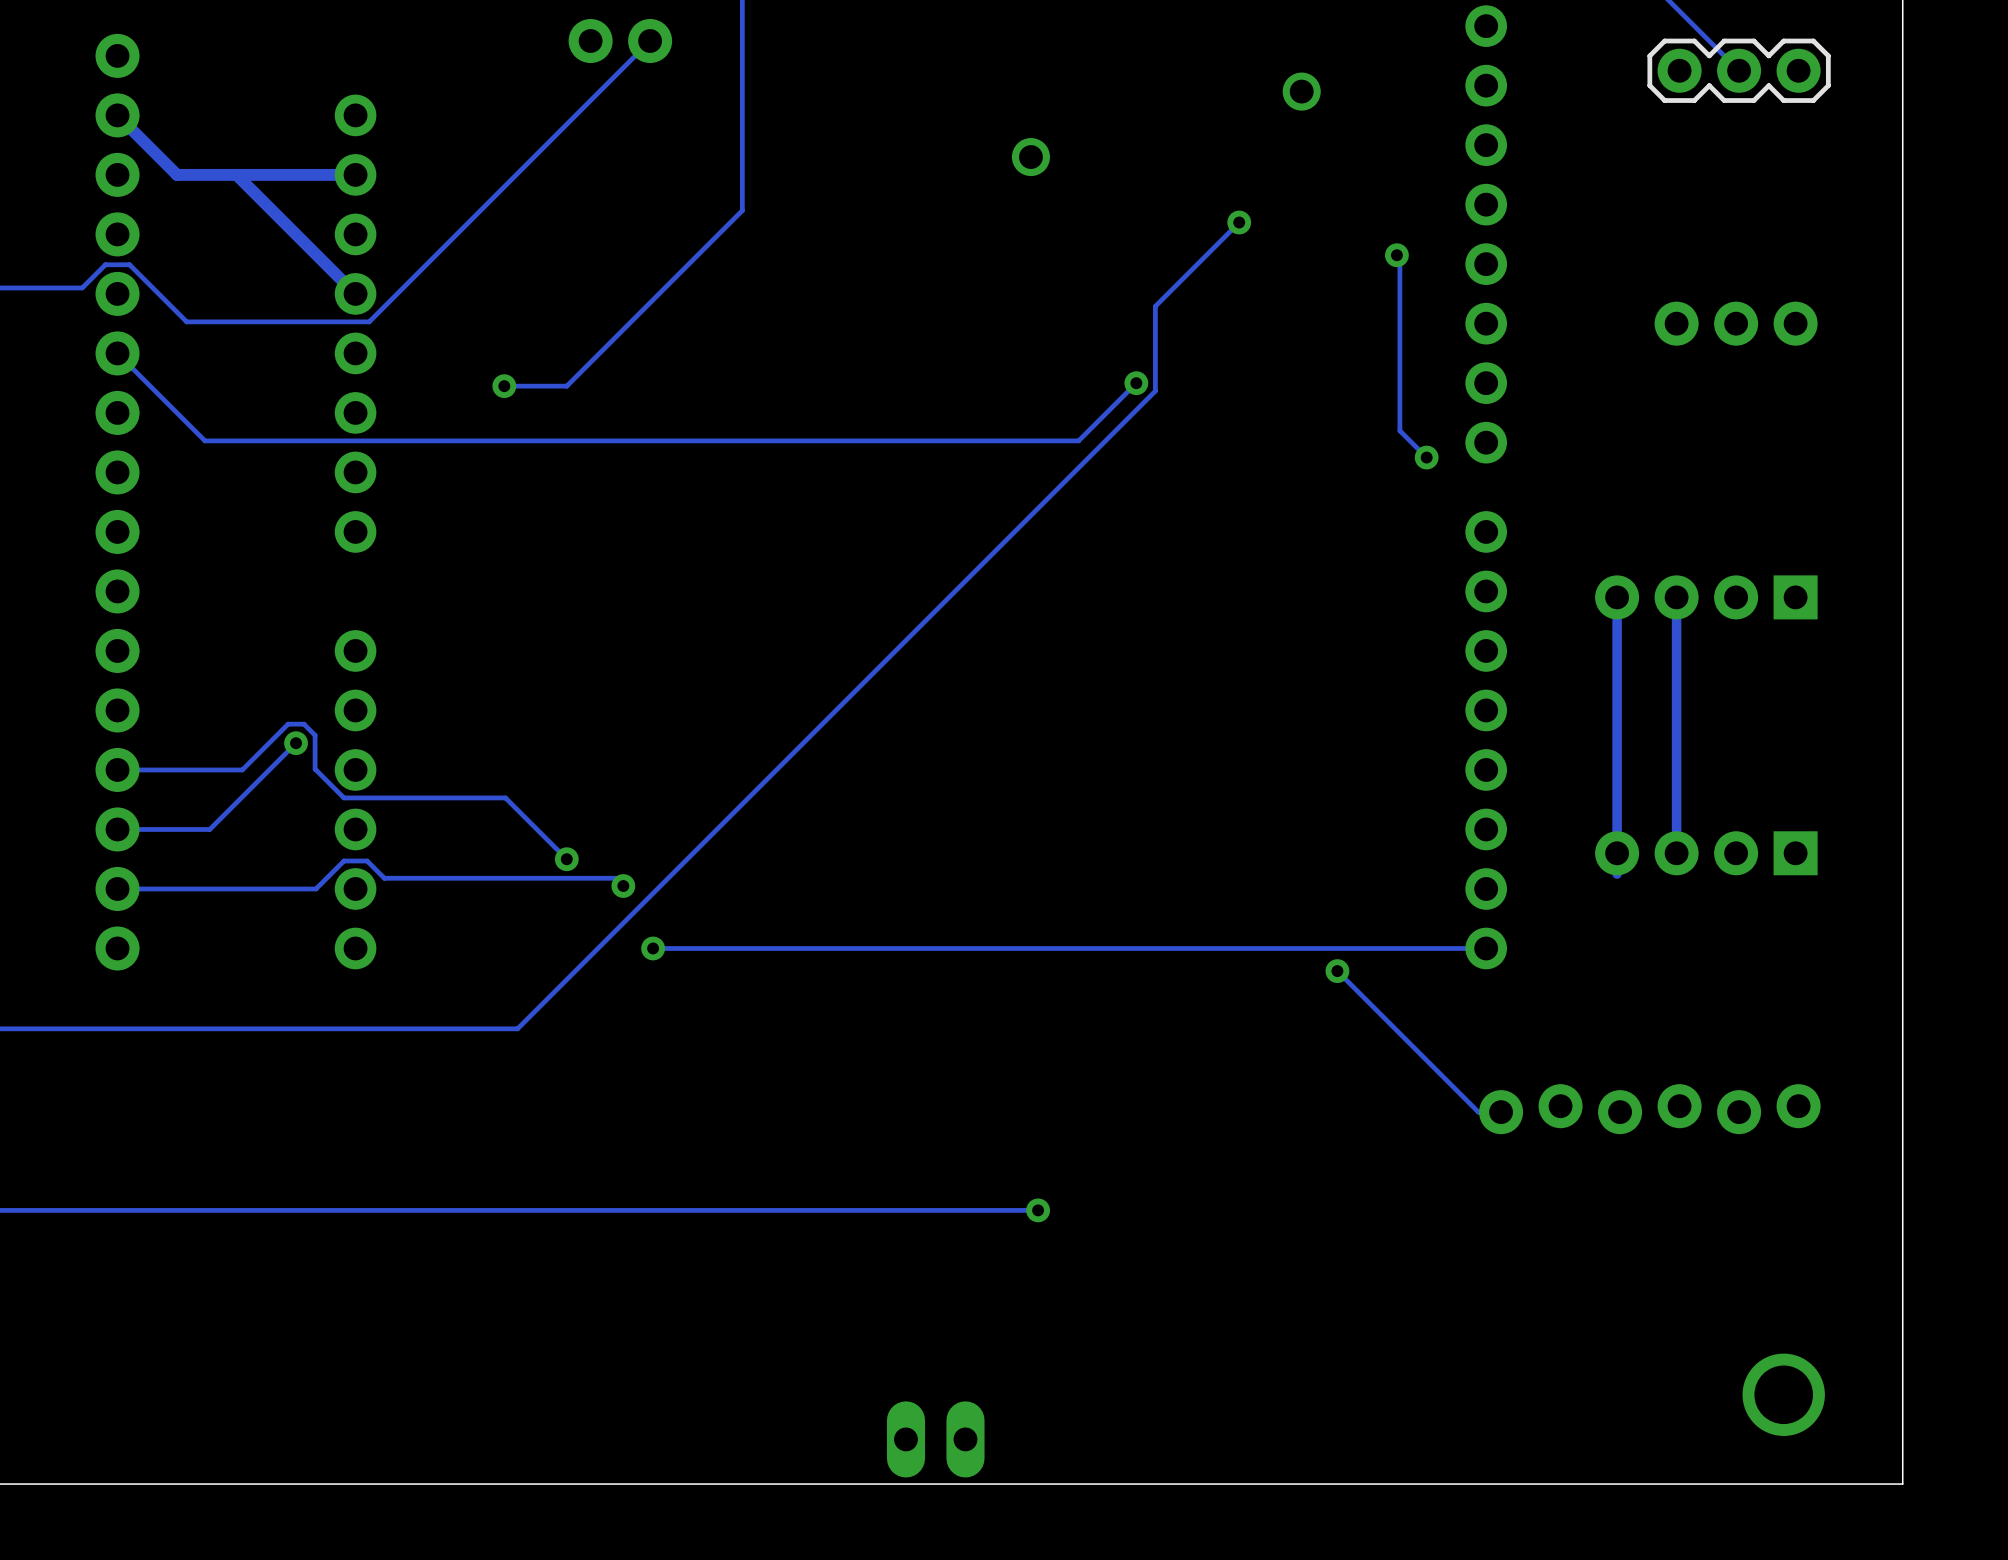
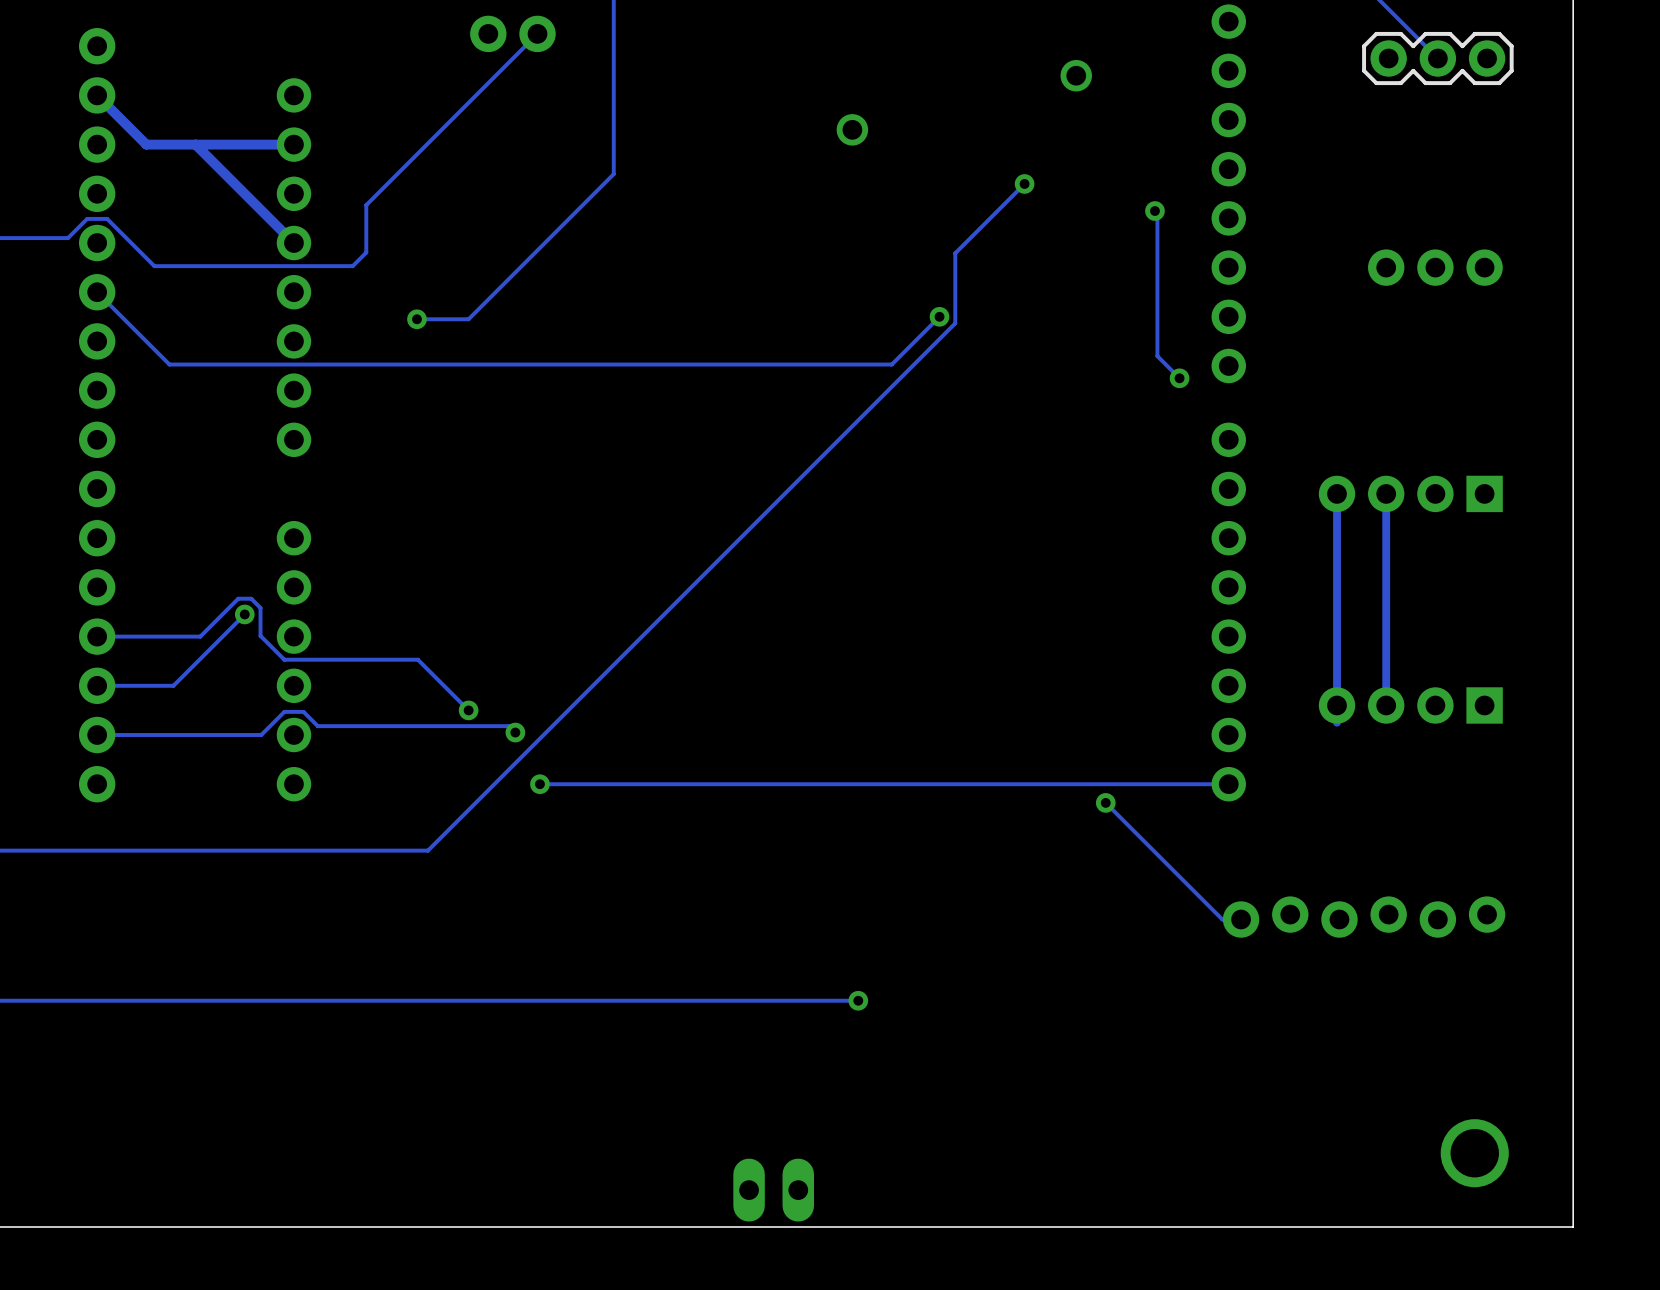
track: (443, 248) (369, 321) -> (366, 205) (366, 252) (352, 266) (305, 266)

